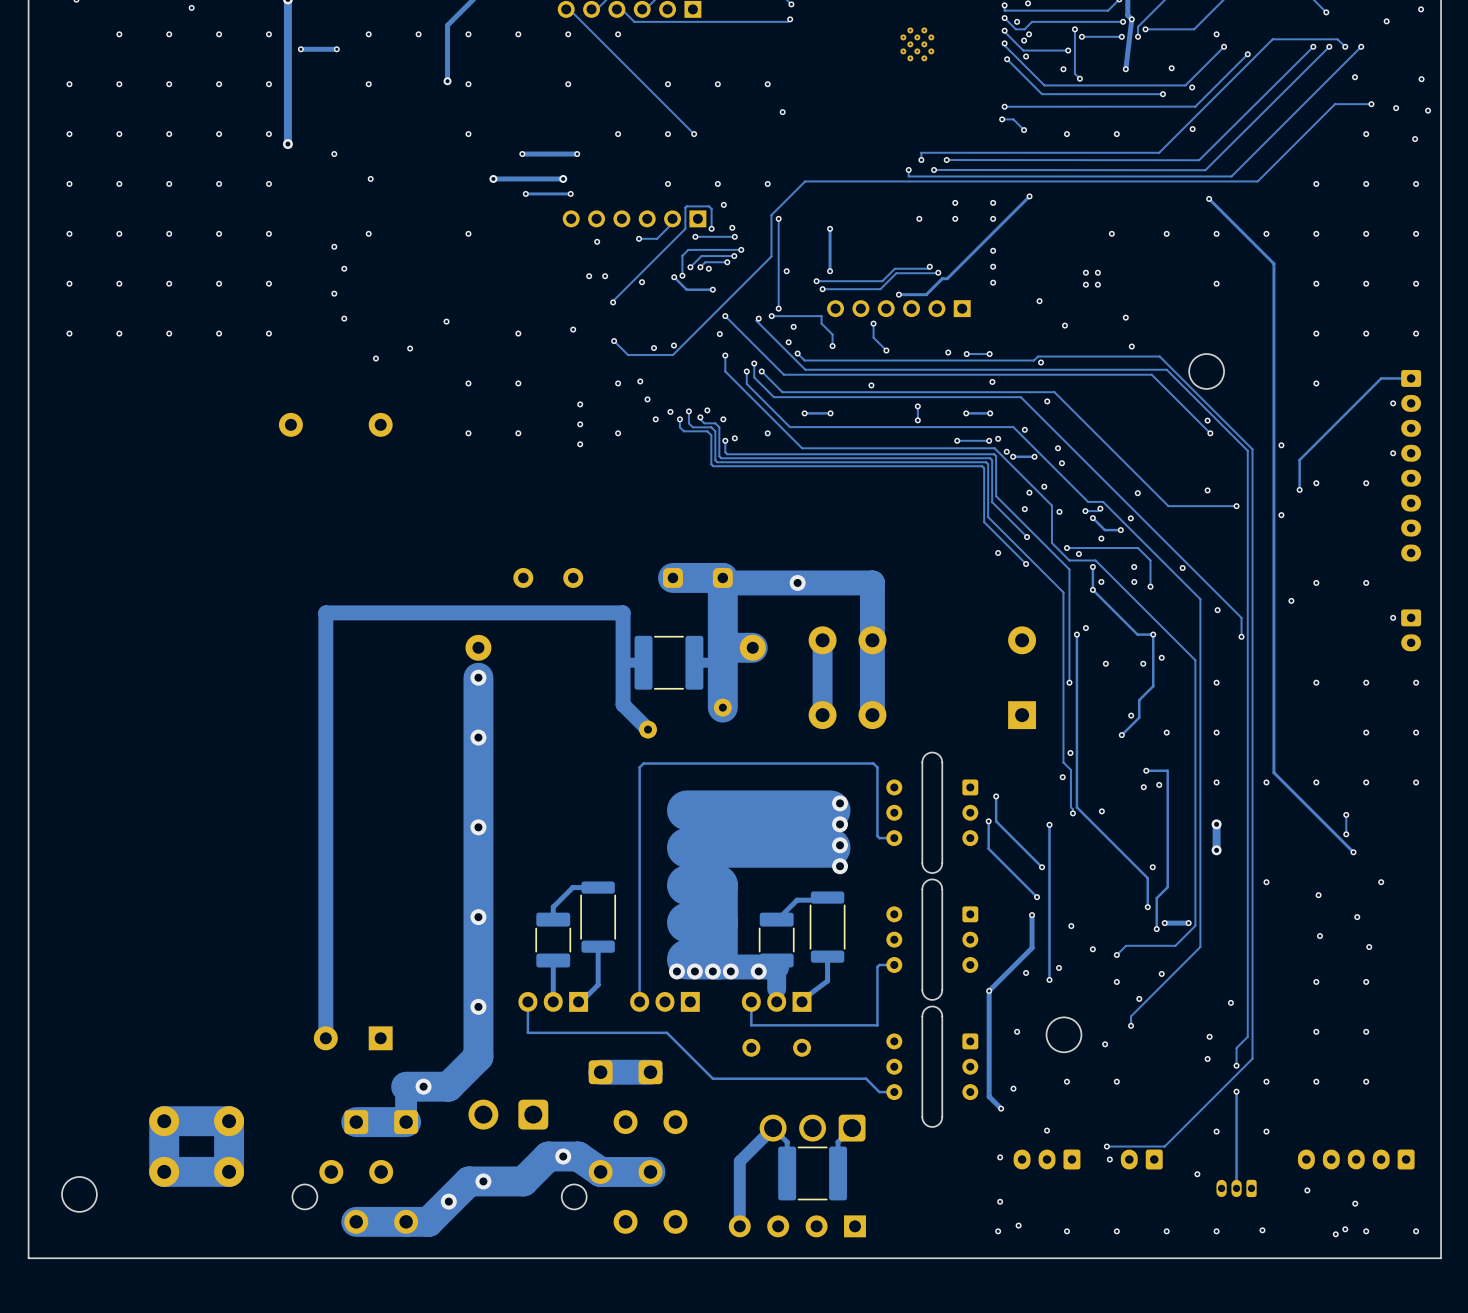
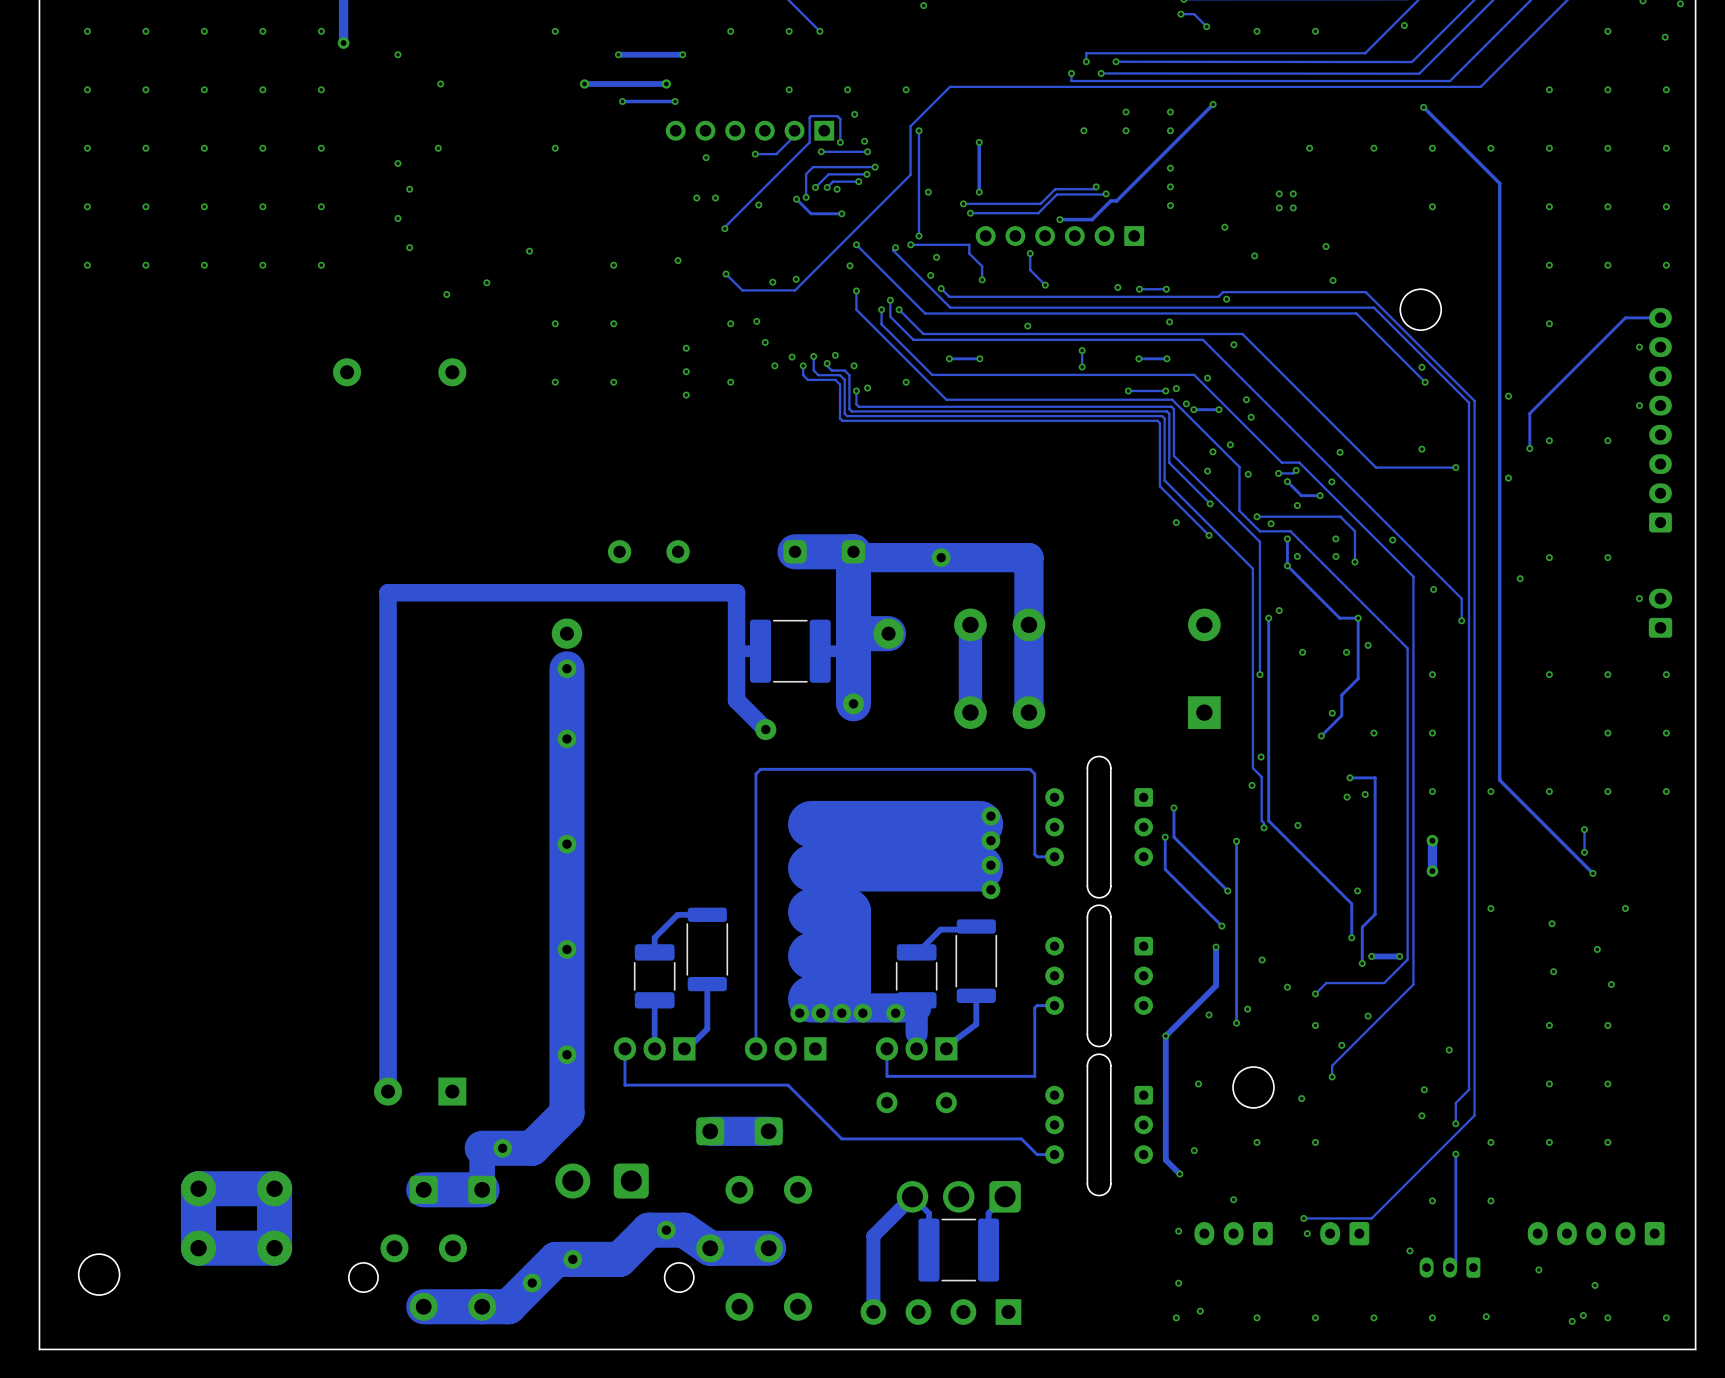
part footprint: [1401, 369, 1422, 562] -> [1649, 307, 1672, 533]
part footprint: [1401, 609, 1422, 652] -> [1648, 588, 1673, 638]
part footprint: [1216, 1179, 1257, 1198] -> [1419, 1257, 1481, 1278]

